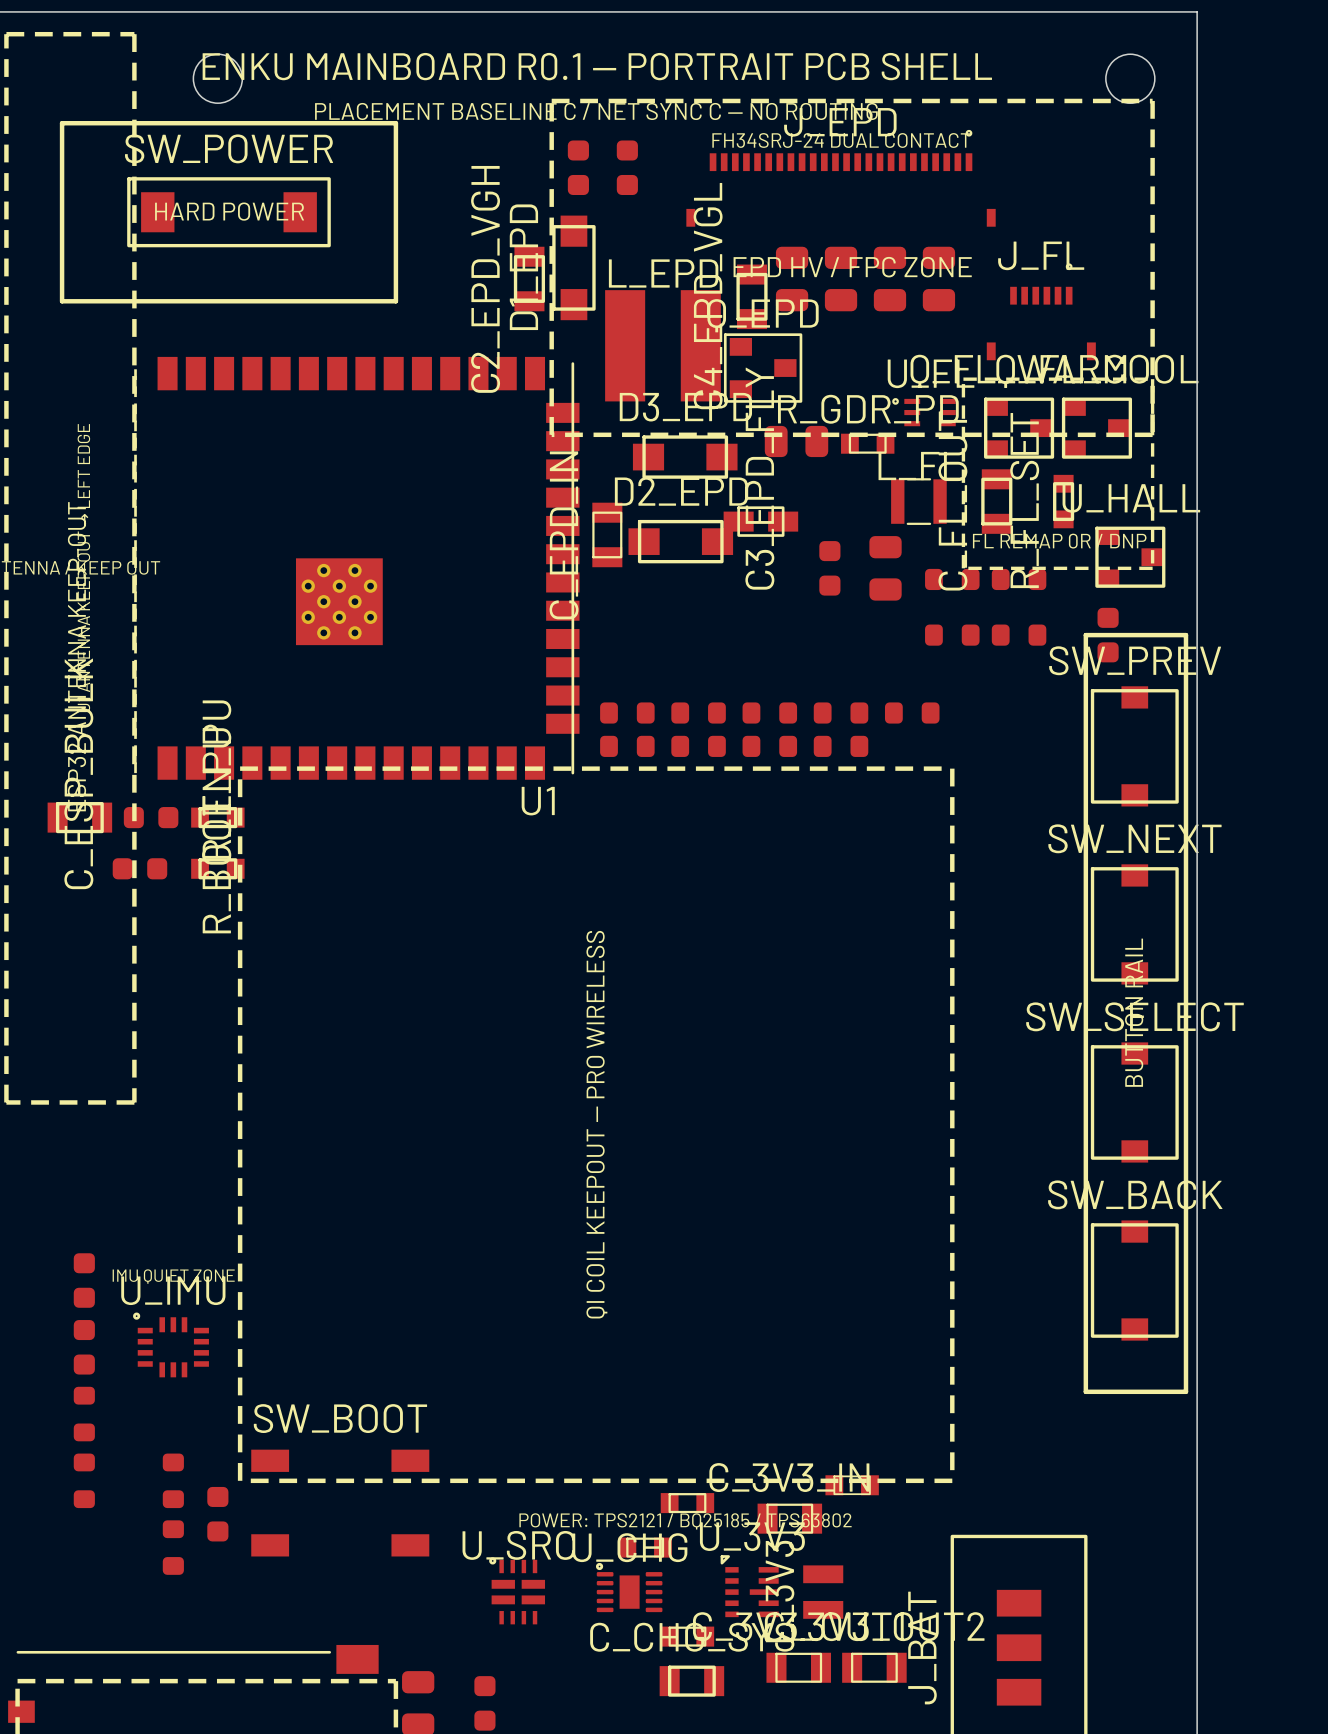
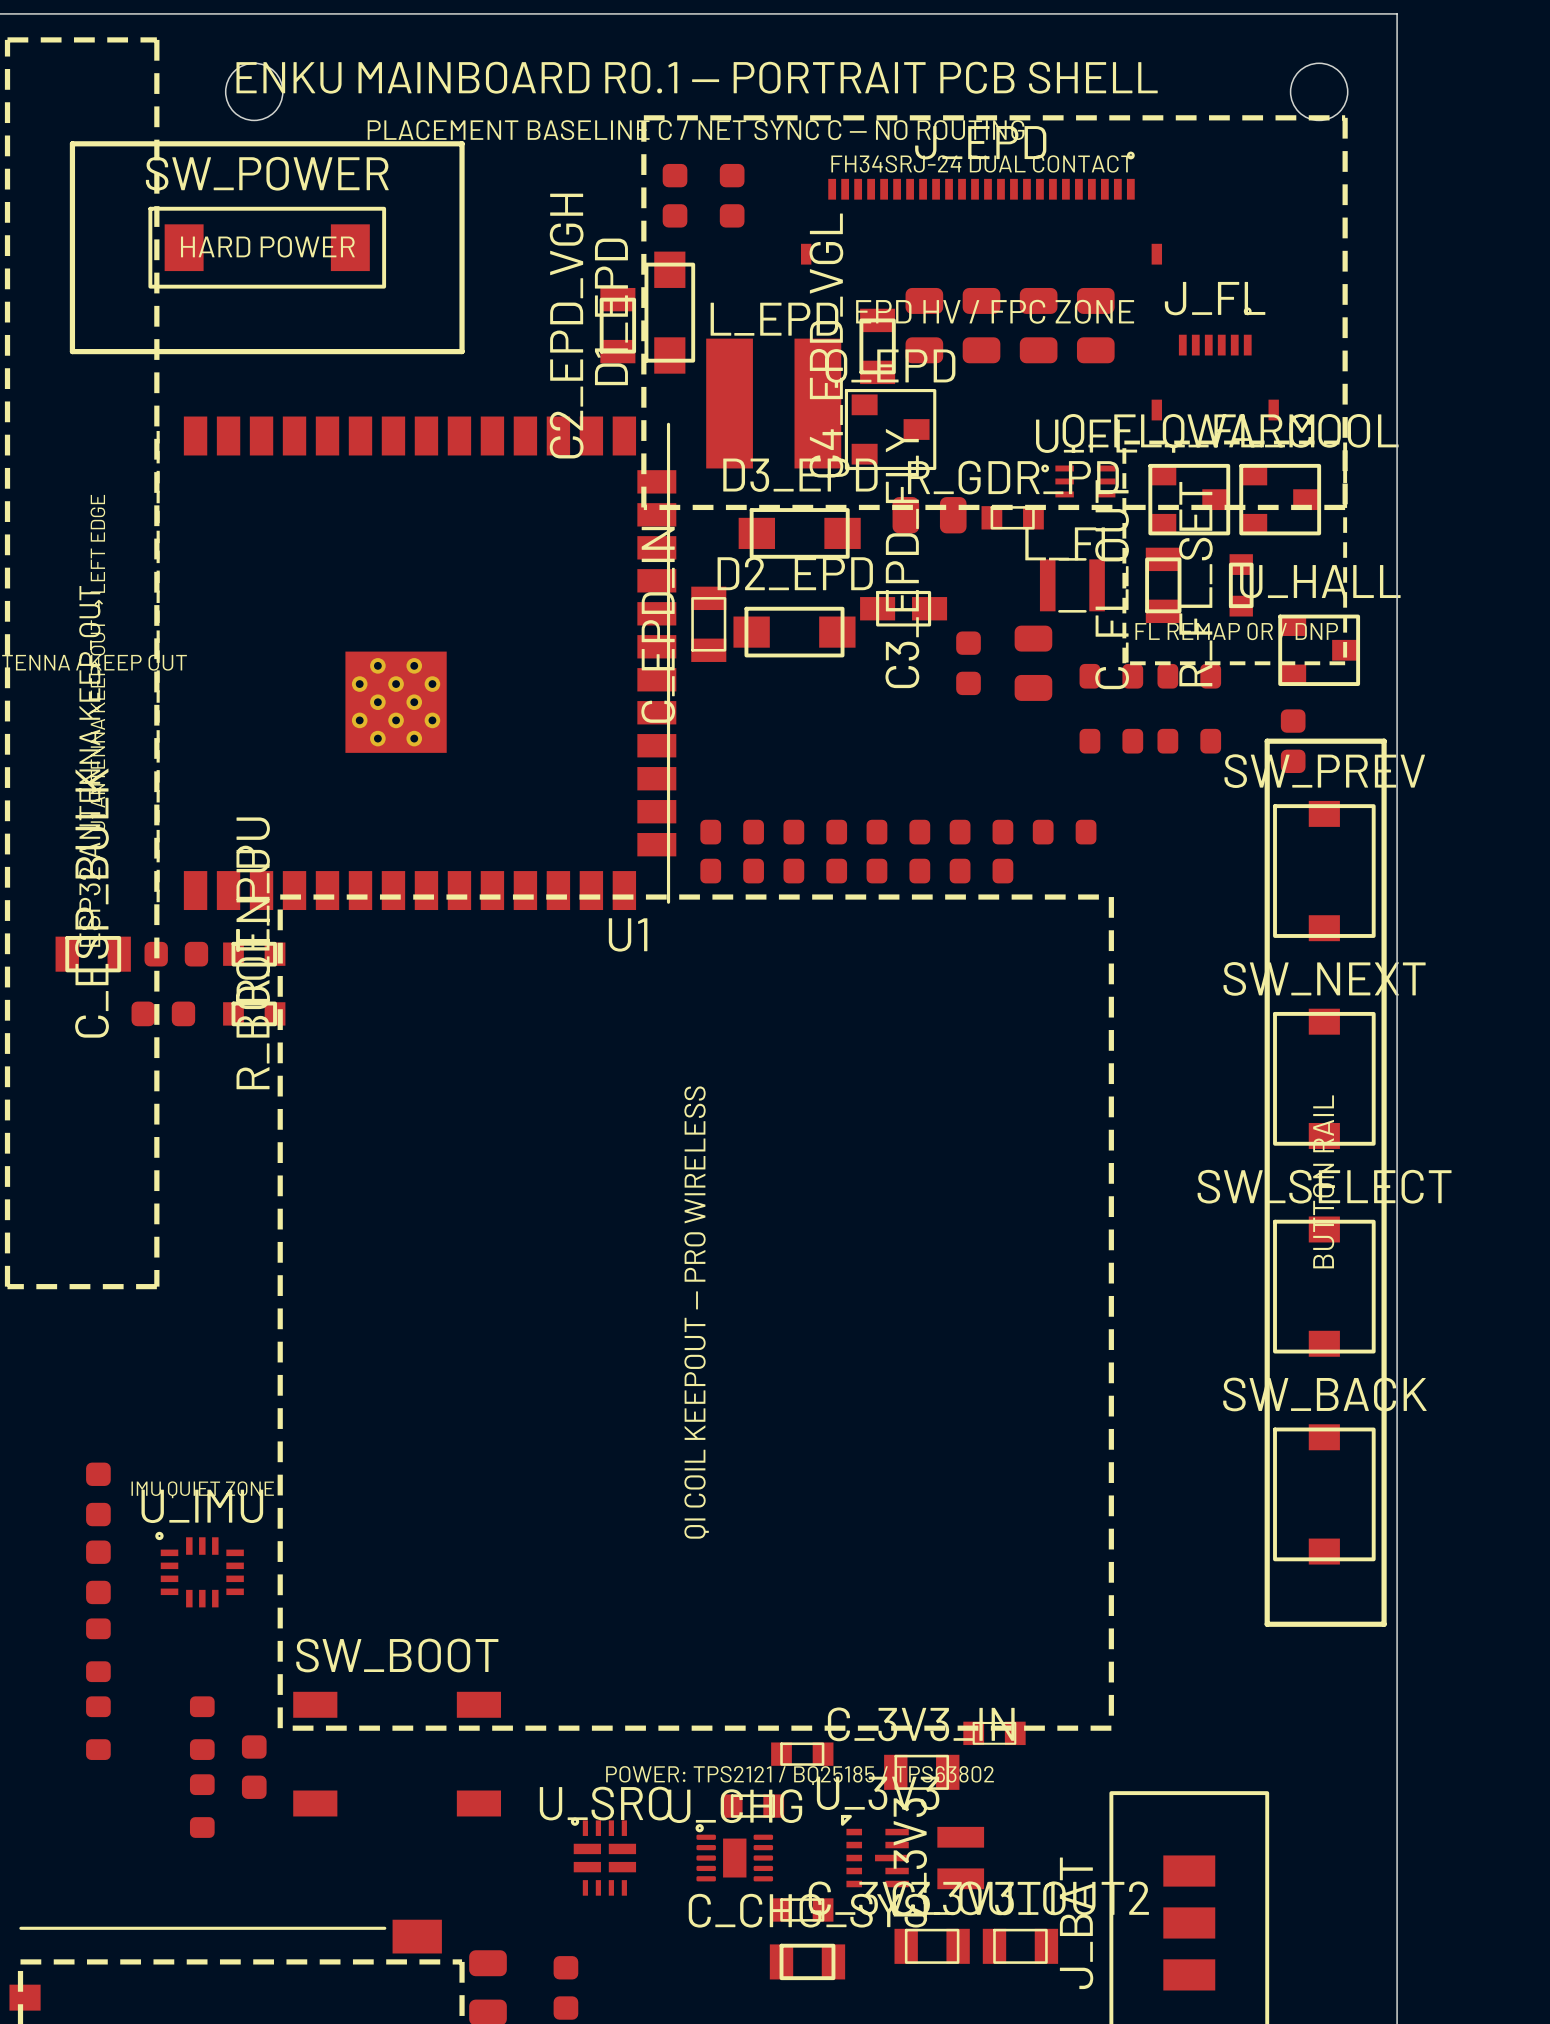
C3_EPD_FLY position: (760, 521) -> (903, 608)

